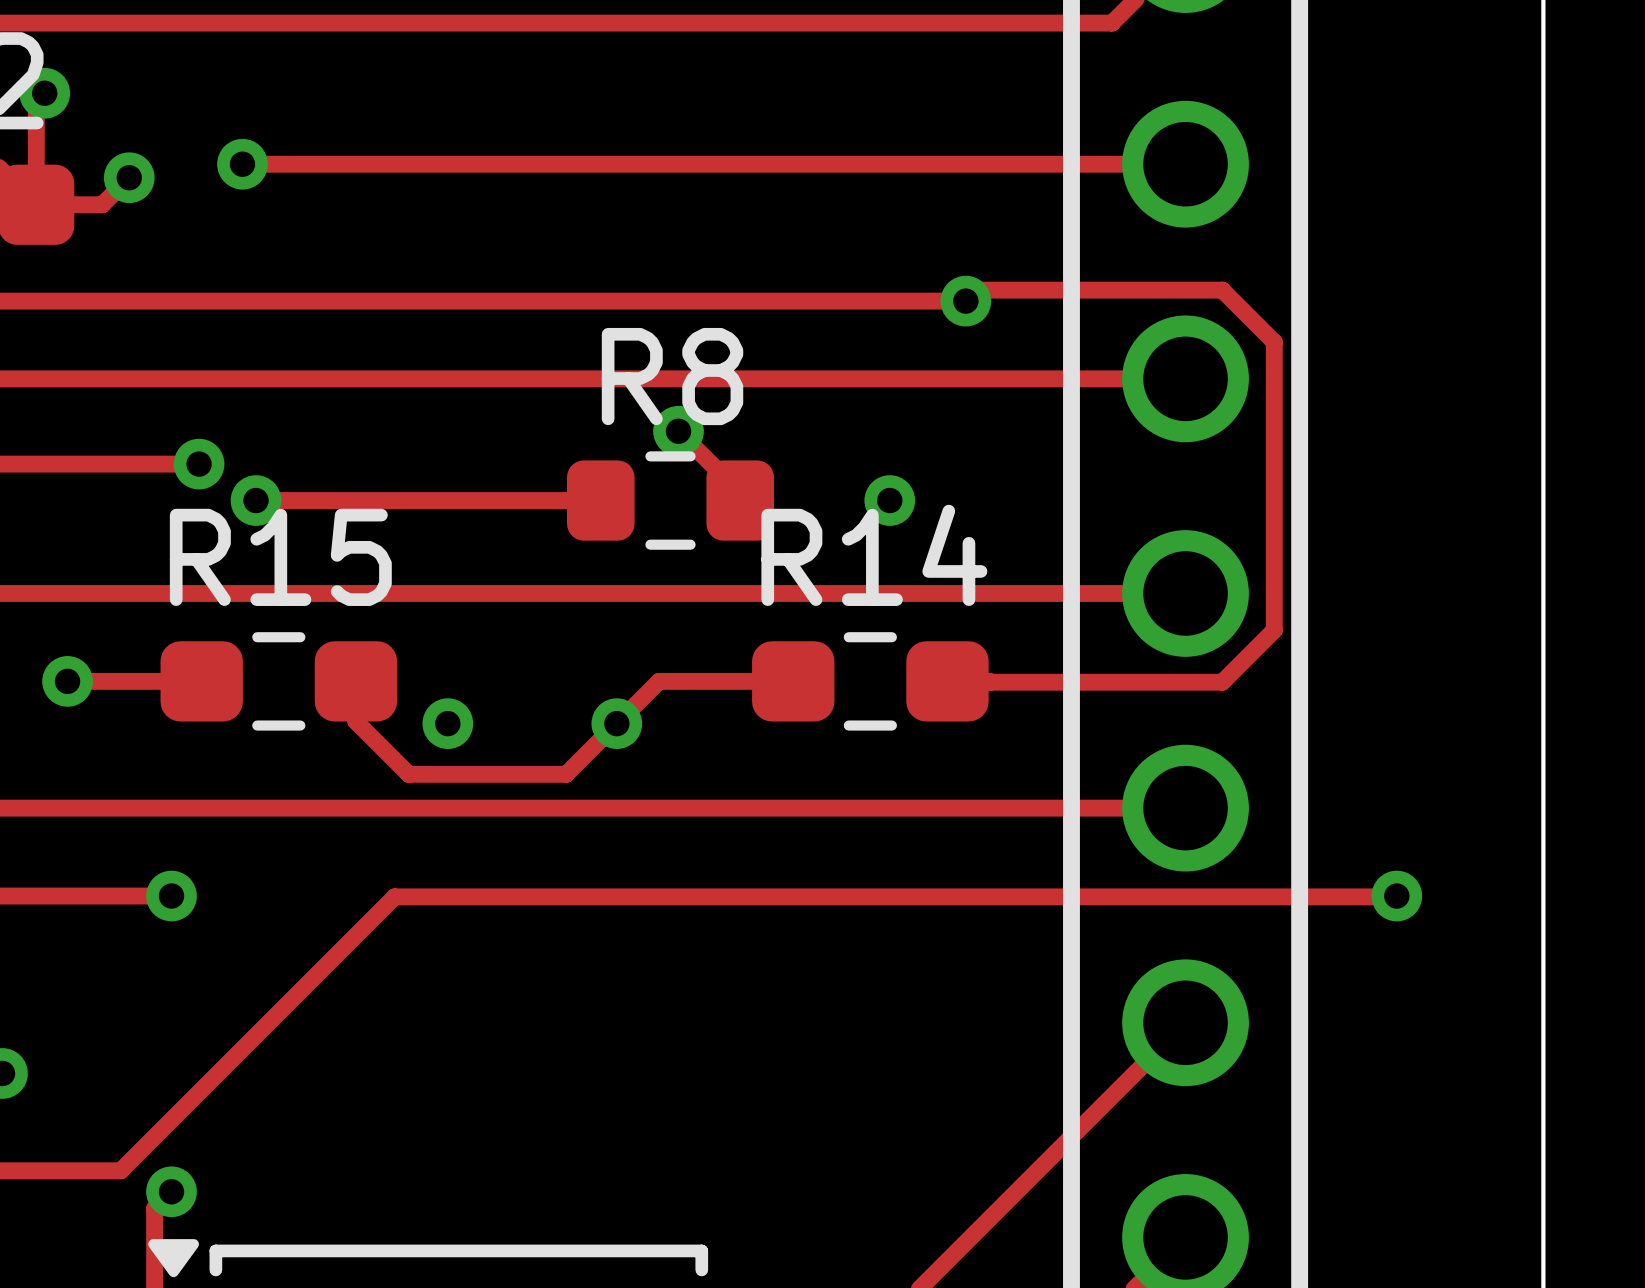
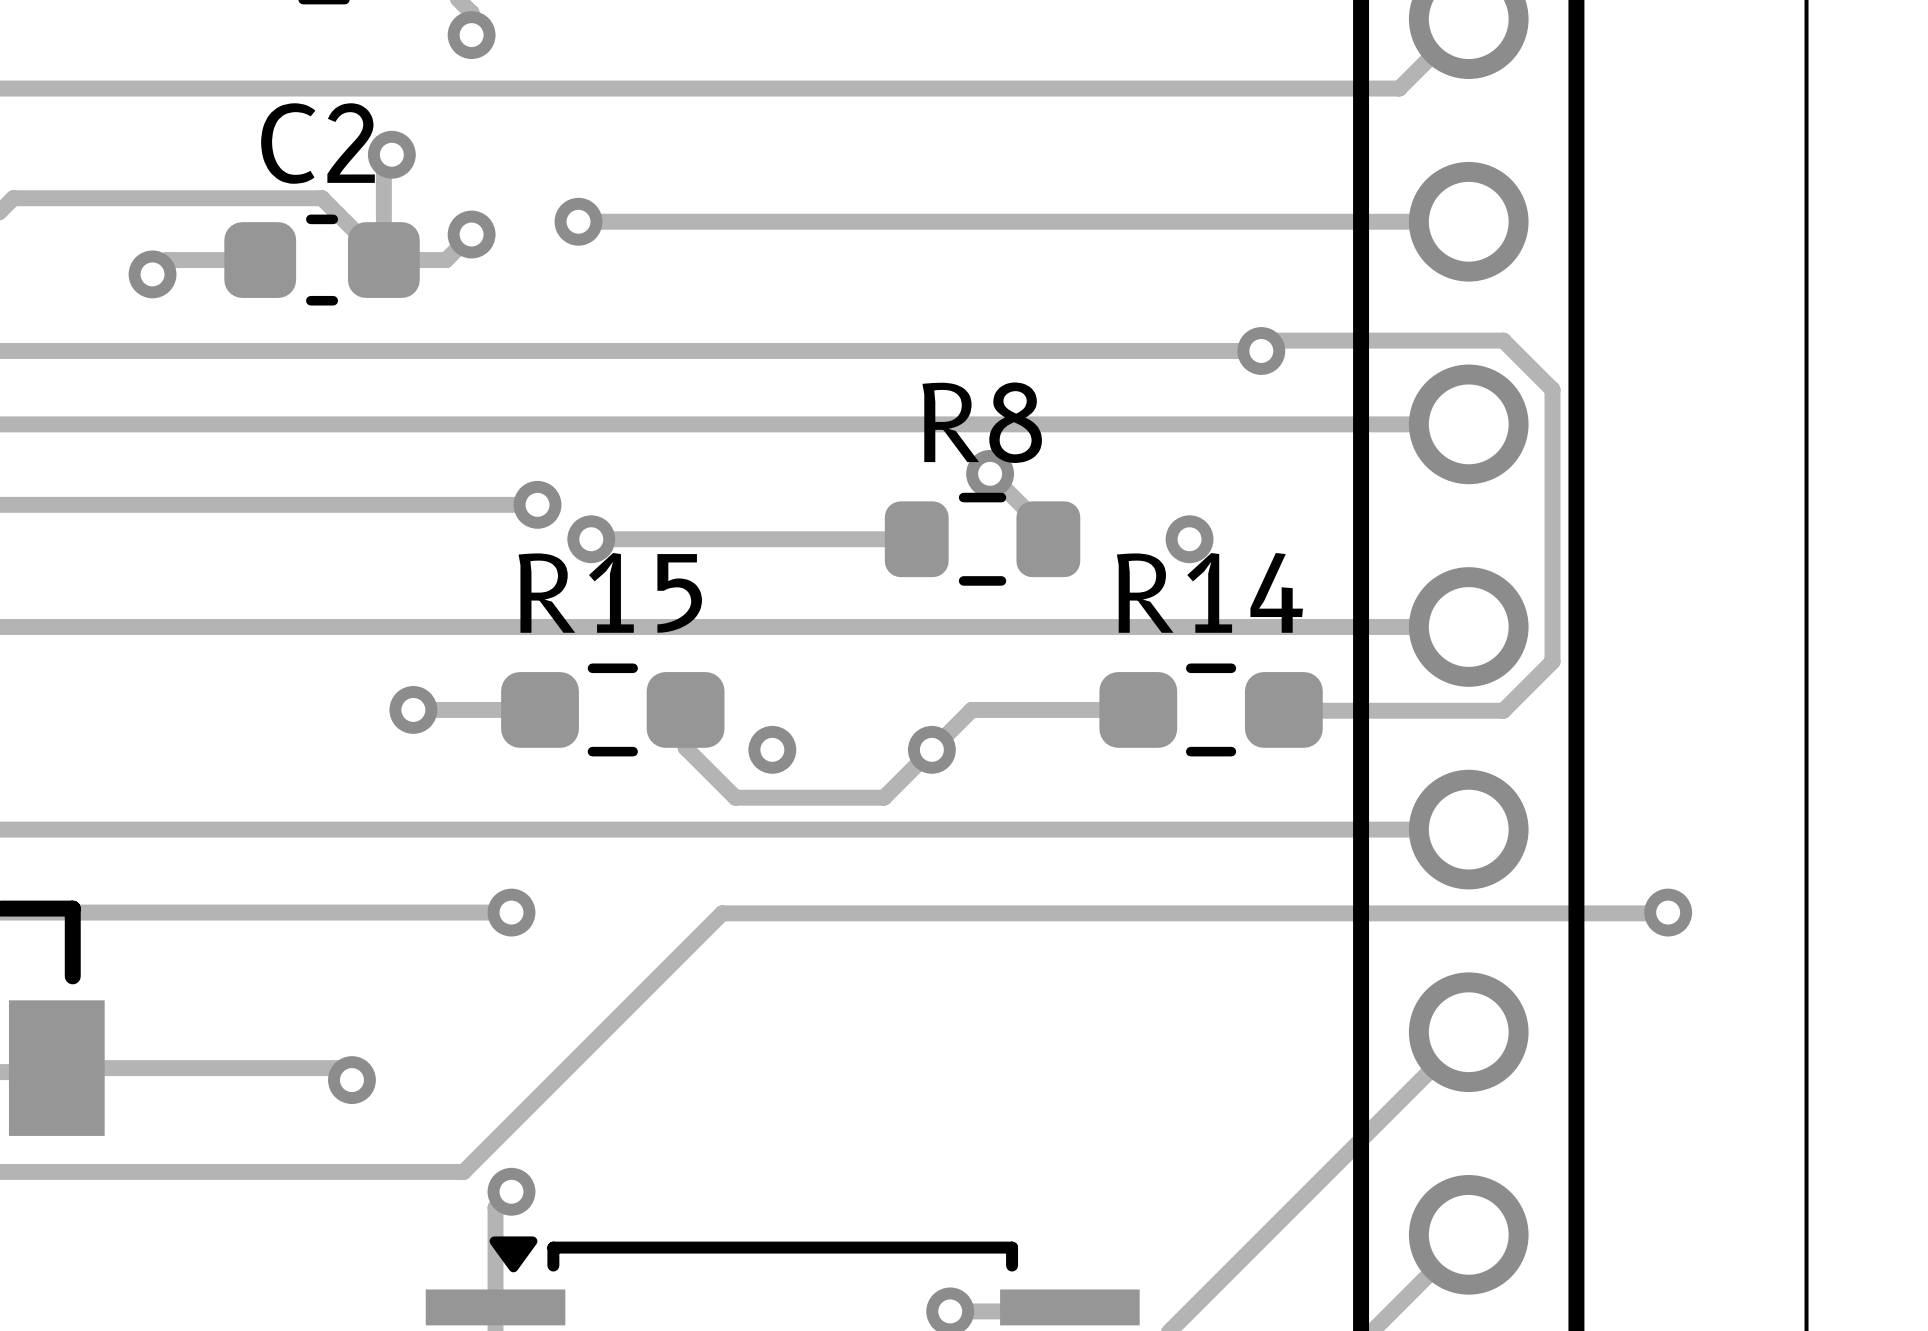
R14 position: (870, 681) -> (1211, 709)

